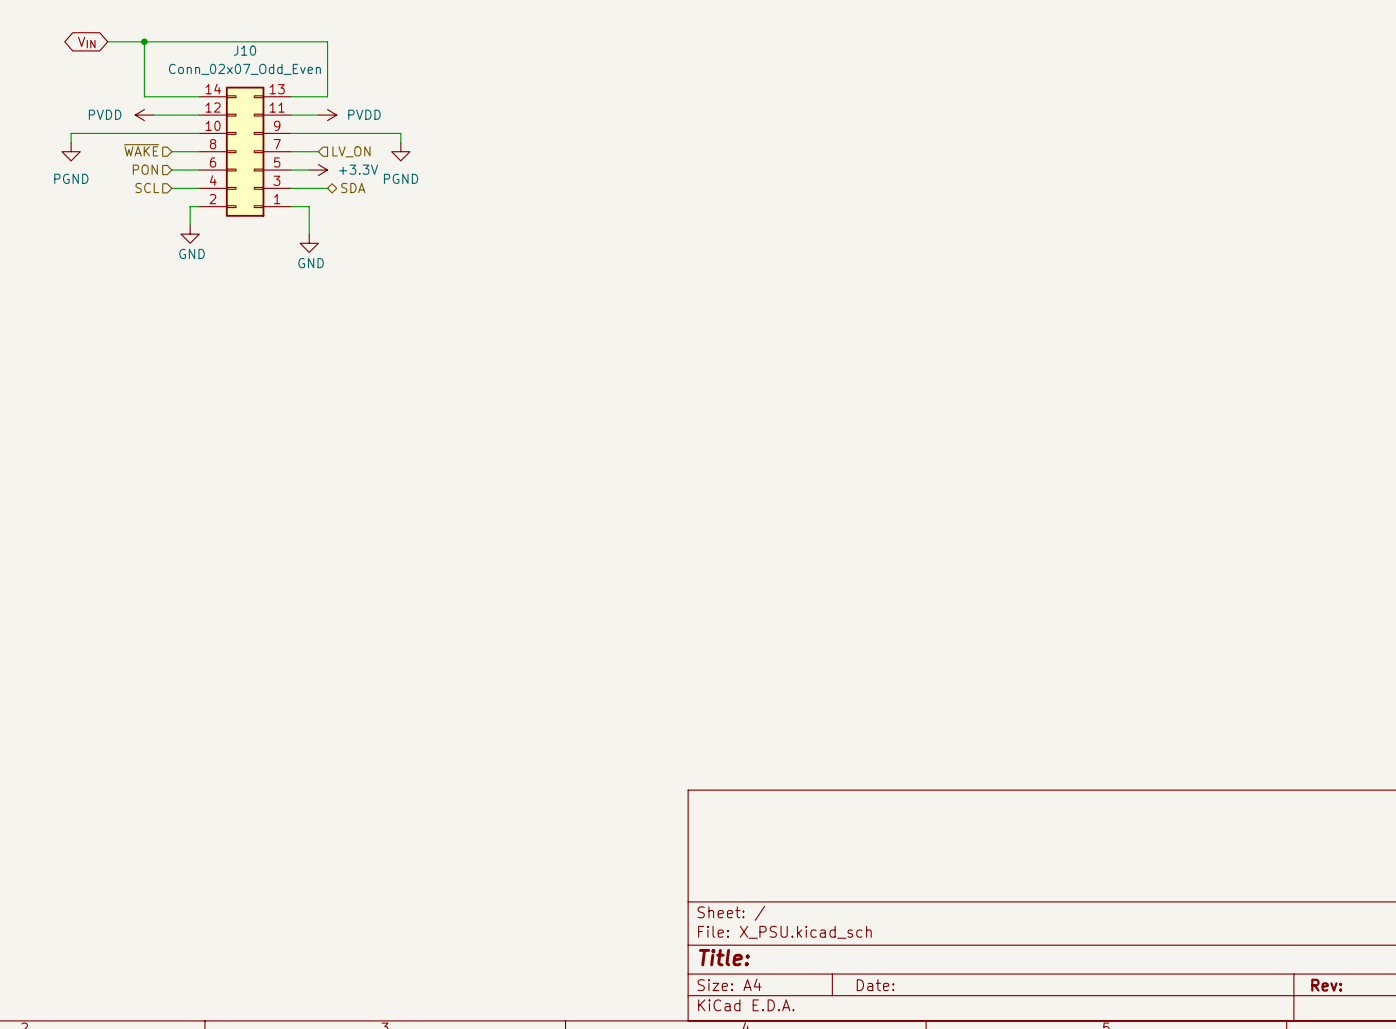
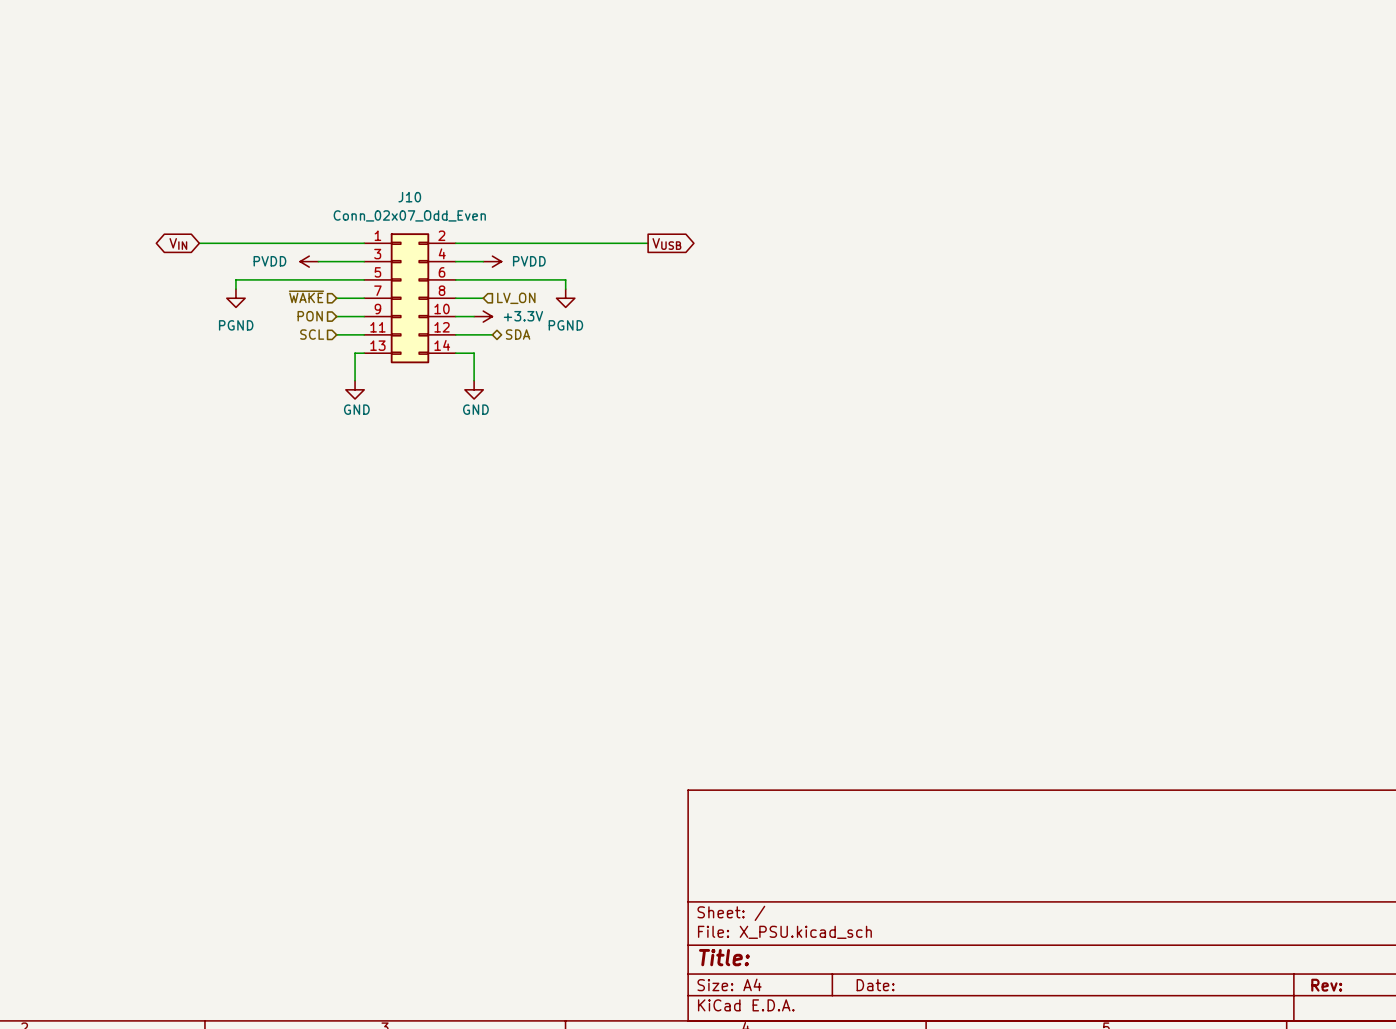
wire: (107, 41) (327, 41) (327, 96) (290, 96) -> none
wire: (144, 41) (144, 96) (199, 96) -> none
junction: (144, 41) -> none
global label: VIN (86, 42) -> none
power symbol: PVDD (144, 115) -> none
wire: (153, 115) (199, 115) -> none
wire: (290, 115) (318, 115) -> none
power symbol: PVDD (327, 115) -> none
wire: (199, 133) (71, 133) (71, 142) -> none
wire: (290, 133) (400, 133) (400, 142) -> none
hierarchical label: ~{WAKE} (141, 150) -> none
power symbol: PGND (71, 151) -> none
wire: (171, 151) (199, 151) -> none
J10 rotation: 0° (245, 151) -> 180° (409, 298)
J10 position: (245, 151) -> (409, 298)
wire: (290, 151) (318, 151) -> (336, 298) (364, 298)
hierarchical label: LV_ON (351, 151) -> none
power symbol: PGND (400, 151) -> none
hierarchical label: PON (145, 169) -> none
wire: (171, 170) (199, 170) -> none
wire: (290, 170) (309, 170) -> none
power symbol: +3.3V (318, 170) -> none
hierarchical label: SCL (147, 188) -> none
wire: (171, 188) (199, 188) -> none
wire: (290, 188) (327, 188) -> none
hierarchical label: SDA (353, 188) -> none
wire: (199, 206) (190, 206) (190, 224) -> none
wire: (290, 206) (309, 206) (309, 234) -> none
power symbol: GND (190, 234) -> none
global label: none -> VIN (178, 243)
wire: none -> (199, 243) (364, 243)
power symbol: GND (309, 243) -> none
wire: none -> (455, 243) (648, 243)
global label: none -> VUSB (666, 243)
power symbol: none -> PVDD (309, 261)
wire: none -> (318, 261) (364, 261)
wire: none -> (455, 261) (483, 261)
power symbol: none -> PVDD (492, 261)
wire: none -> (364, 279) (235, 279) (235, 289)
wire: none -> (455, 279) (565, 279) (565, 289)
hierarchical label: none -> ~{WAKE} (306, 296)
power symbol: none -> PGND (235, 298)
wire: none -> (455, 298) (483, 298)
hierarchical label: none -> LV_ON (516, 298)
power symbol: none -> PGND (565, 298)
hierarchical label: none -> PON (310, 316)
wire: none -> (336, 316) (364, 316)
wire: none -> (455, 316) (474, 316)
power symbol: none -> +3.3V (483, 316)
hierarchical label: none -> SCL (312, 334)
wire: none -> (336, 334) (364, 334)
wire: none -> (455, 334) (492, 334)
hierarchical label: none -> SDA (518, 334)
wire: none -> (364, 353) (355, 353) (355, 380)
wire: none -> (455, 353) (474, 353) (474, 380)
power symbol: none -> GND (355, 389)
power symbol: none -> GND (474, 389)

